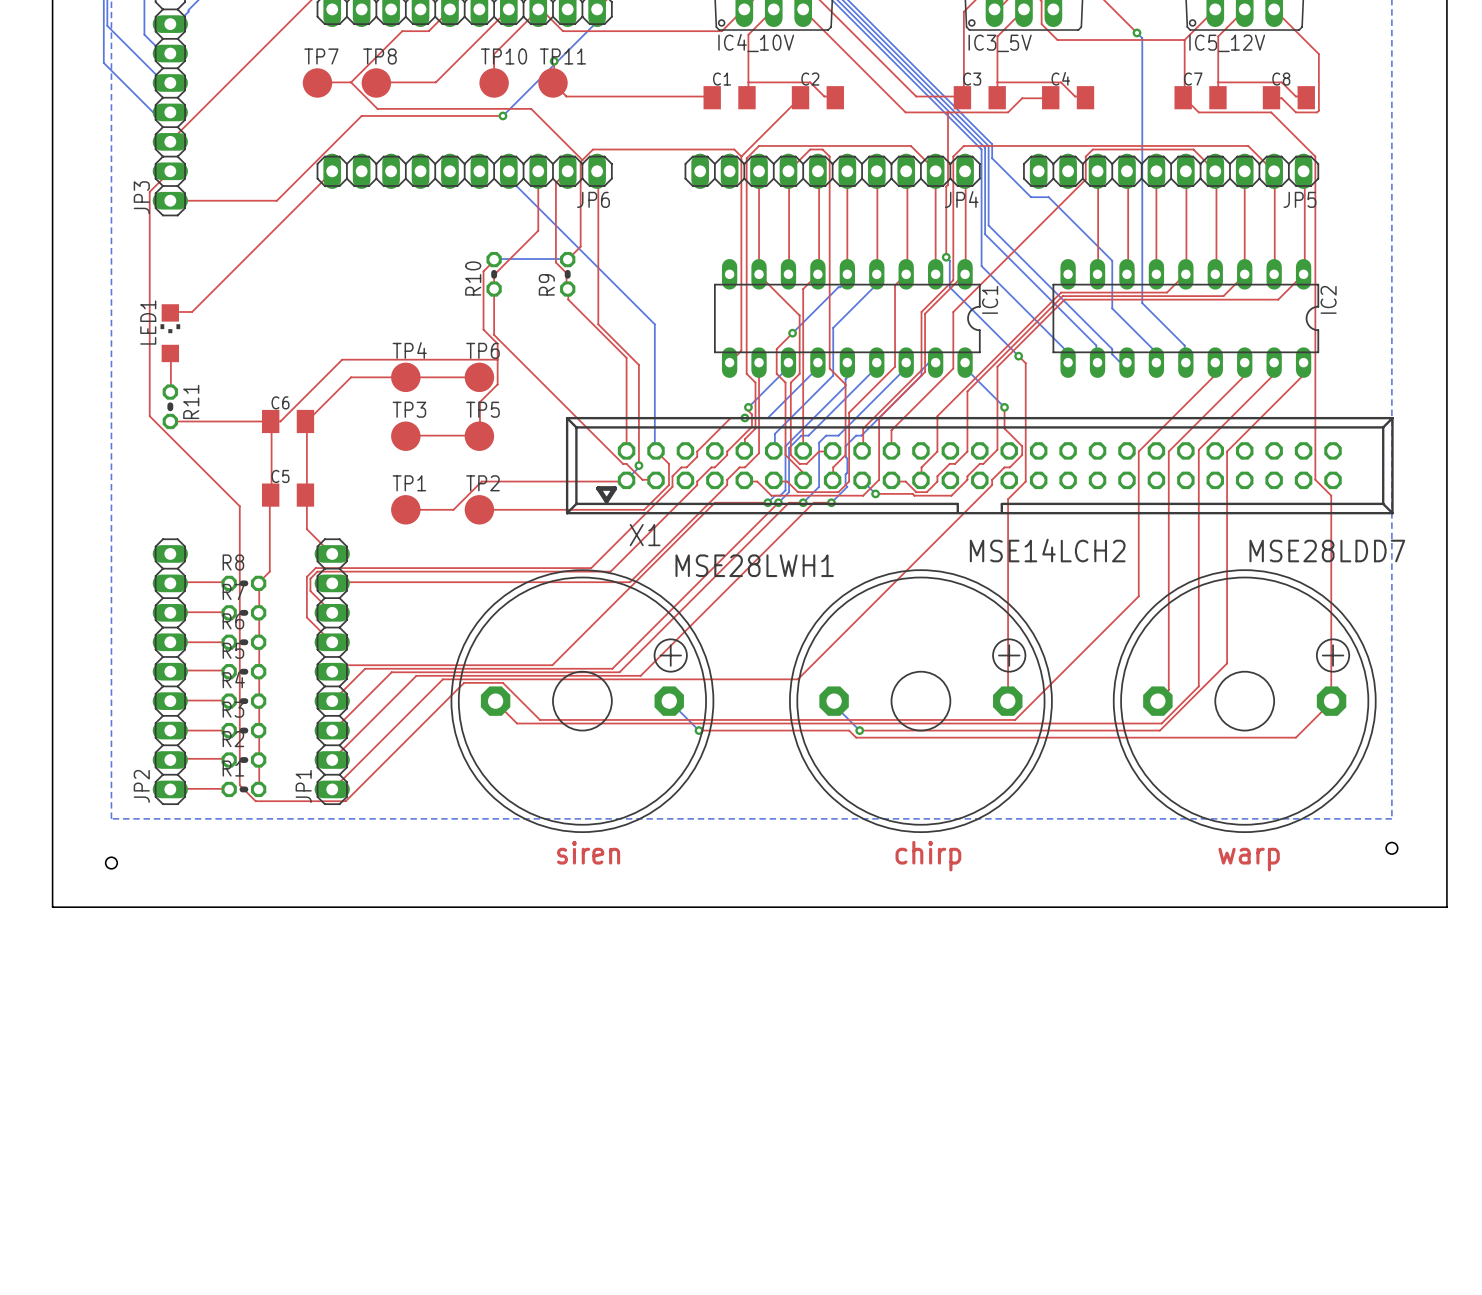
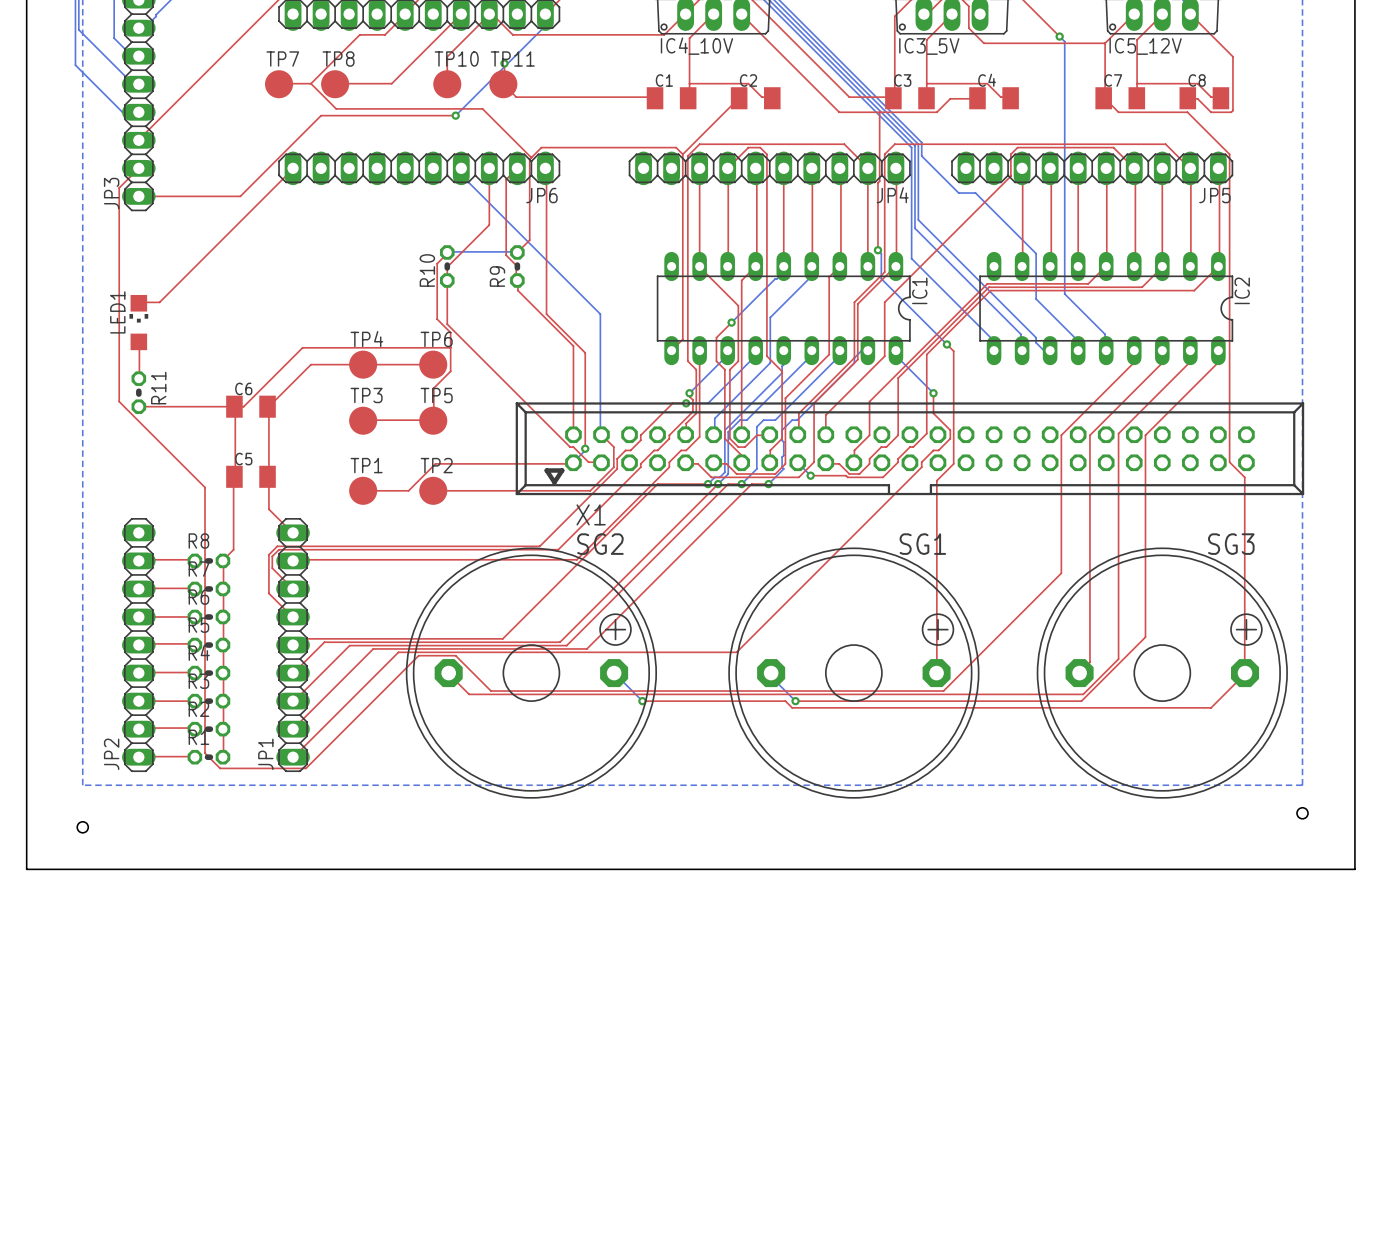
MSE14LCH2 name: MSE14LCH2 (1047, 550) -> SG1 (922, 544)
MSE28LDD7 name: MSE28LDD7 (1327, 551) -> SG3 (1231, 544)
MSE28LWH1 name: MSE28LWH1 (754, 565) -> SG2 (600, 544)
text: siren (588, 852) -> none
text: chirp (928, 856) -> none
text: warp (1249, 859) -> none

